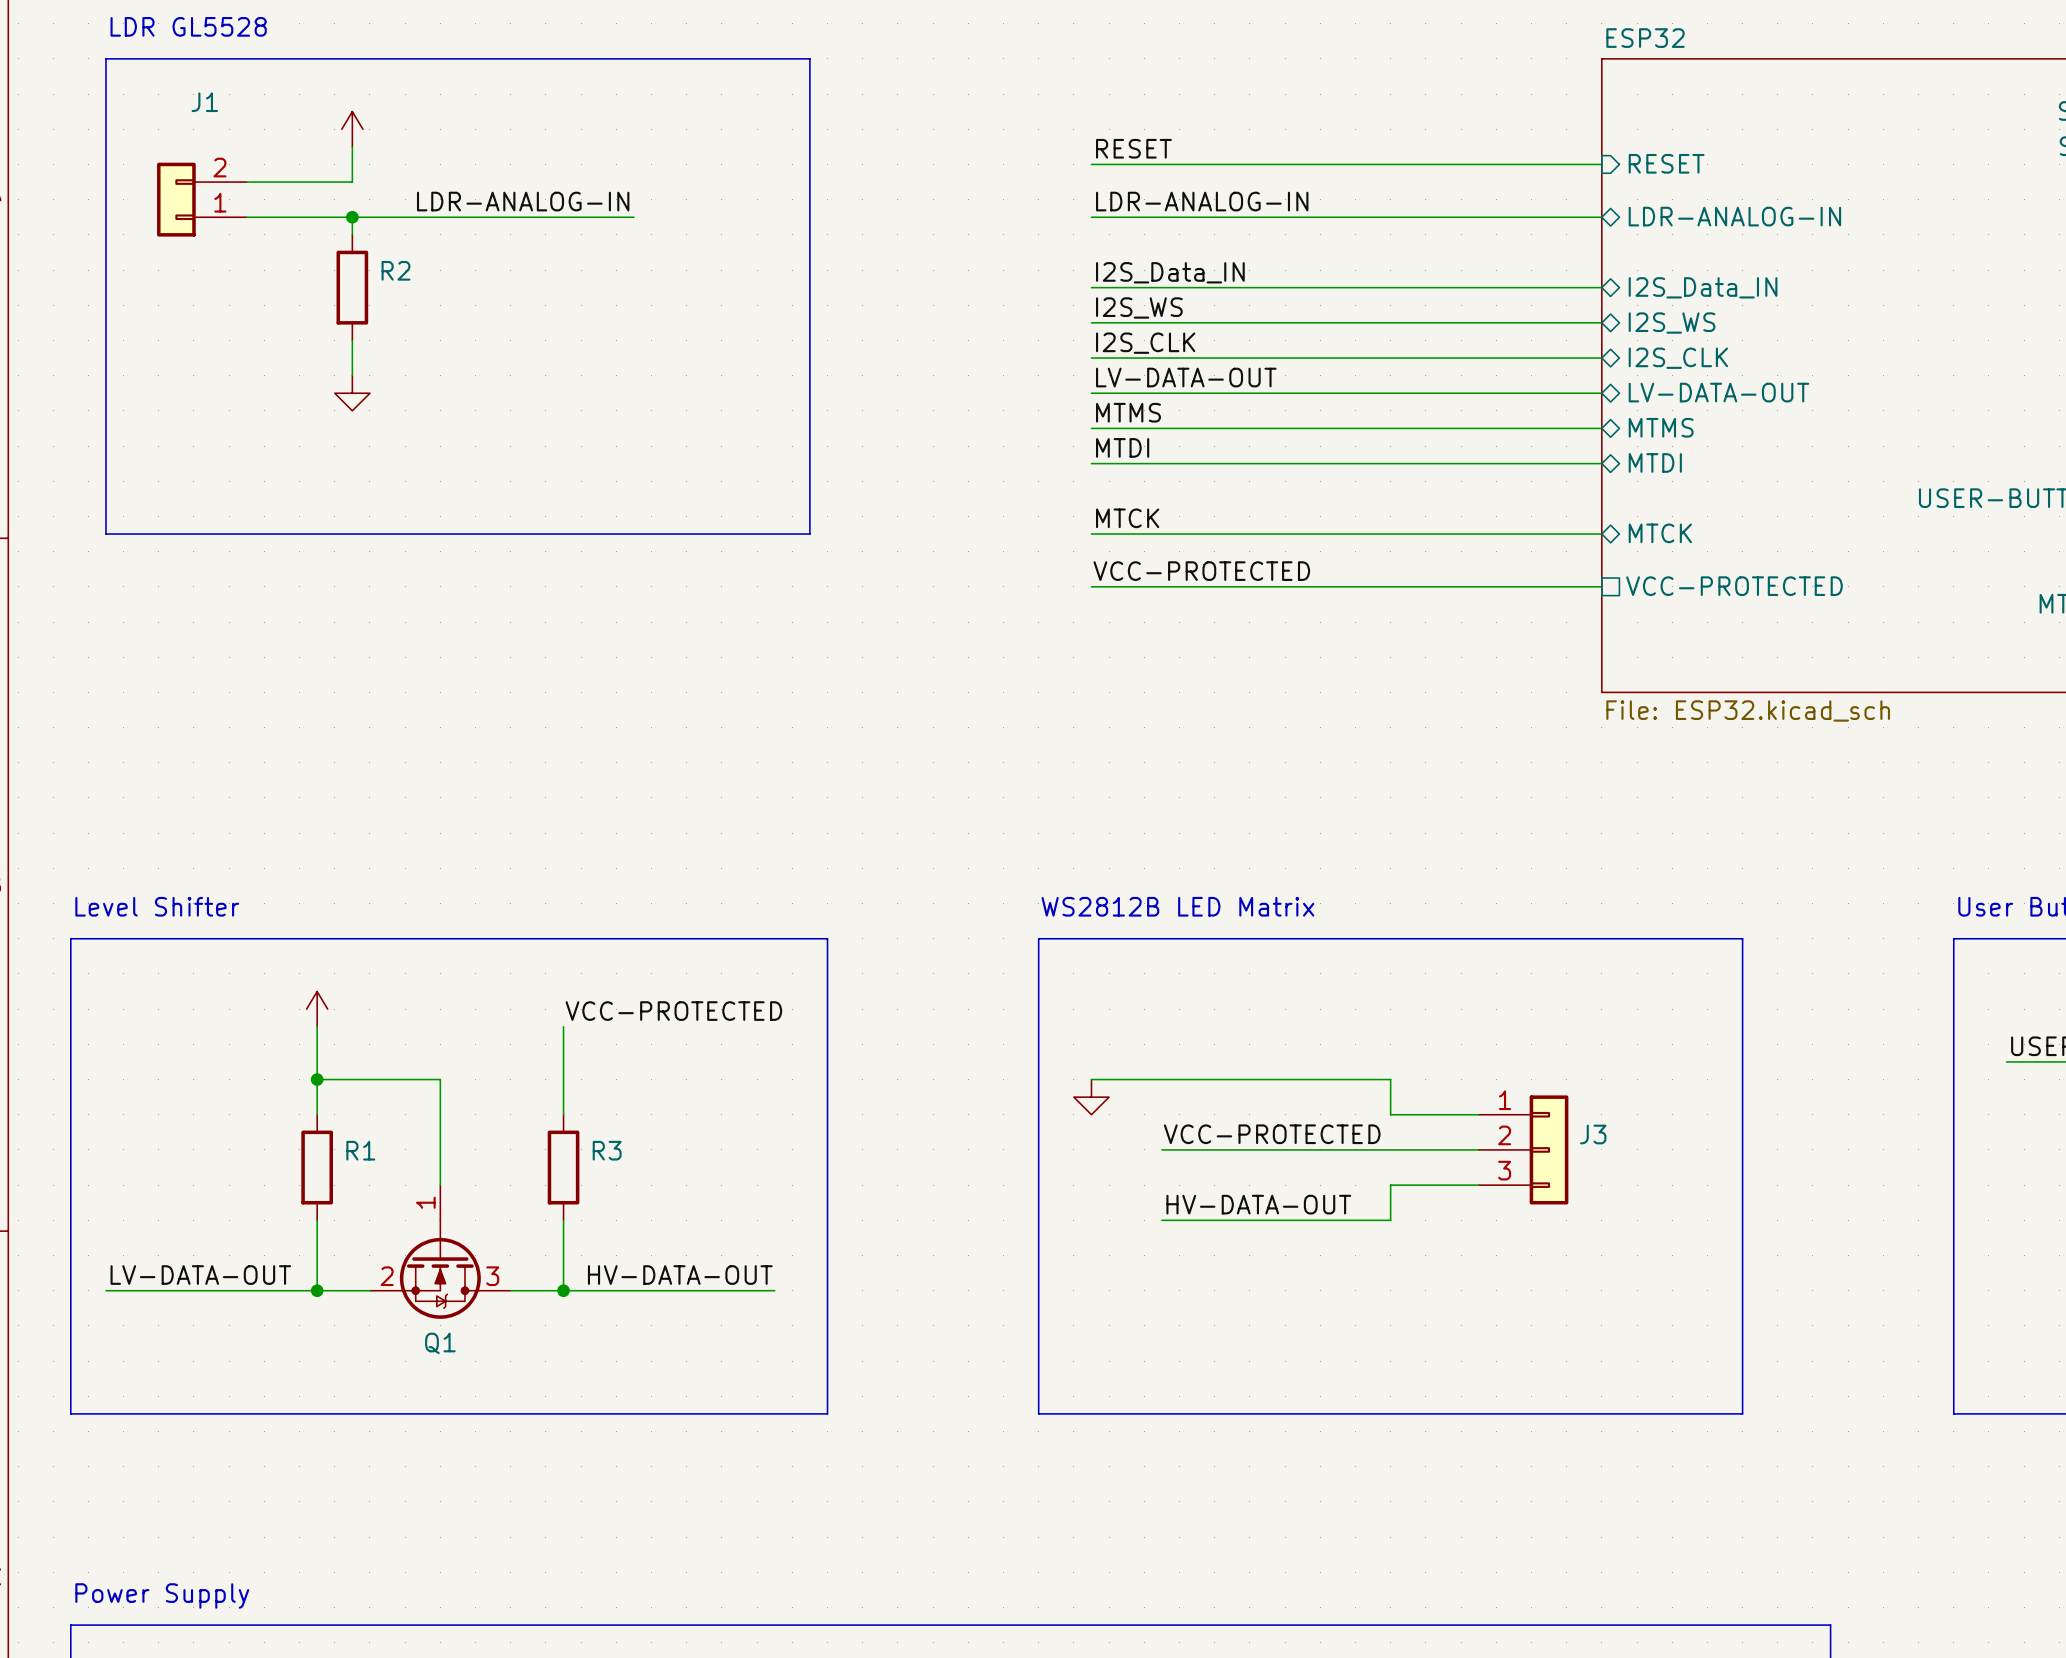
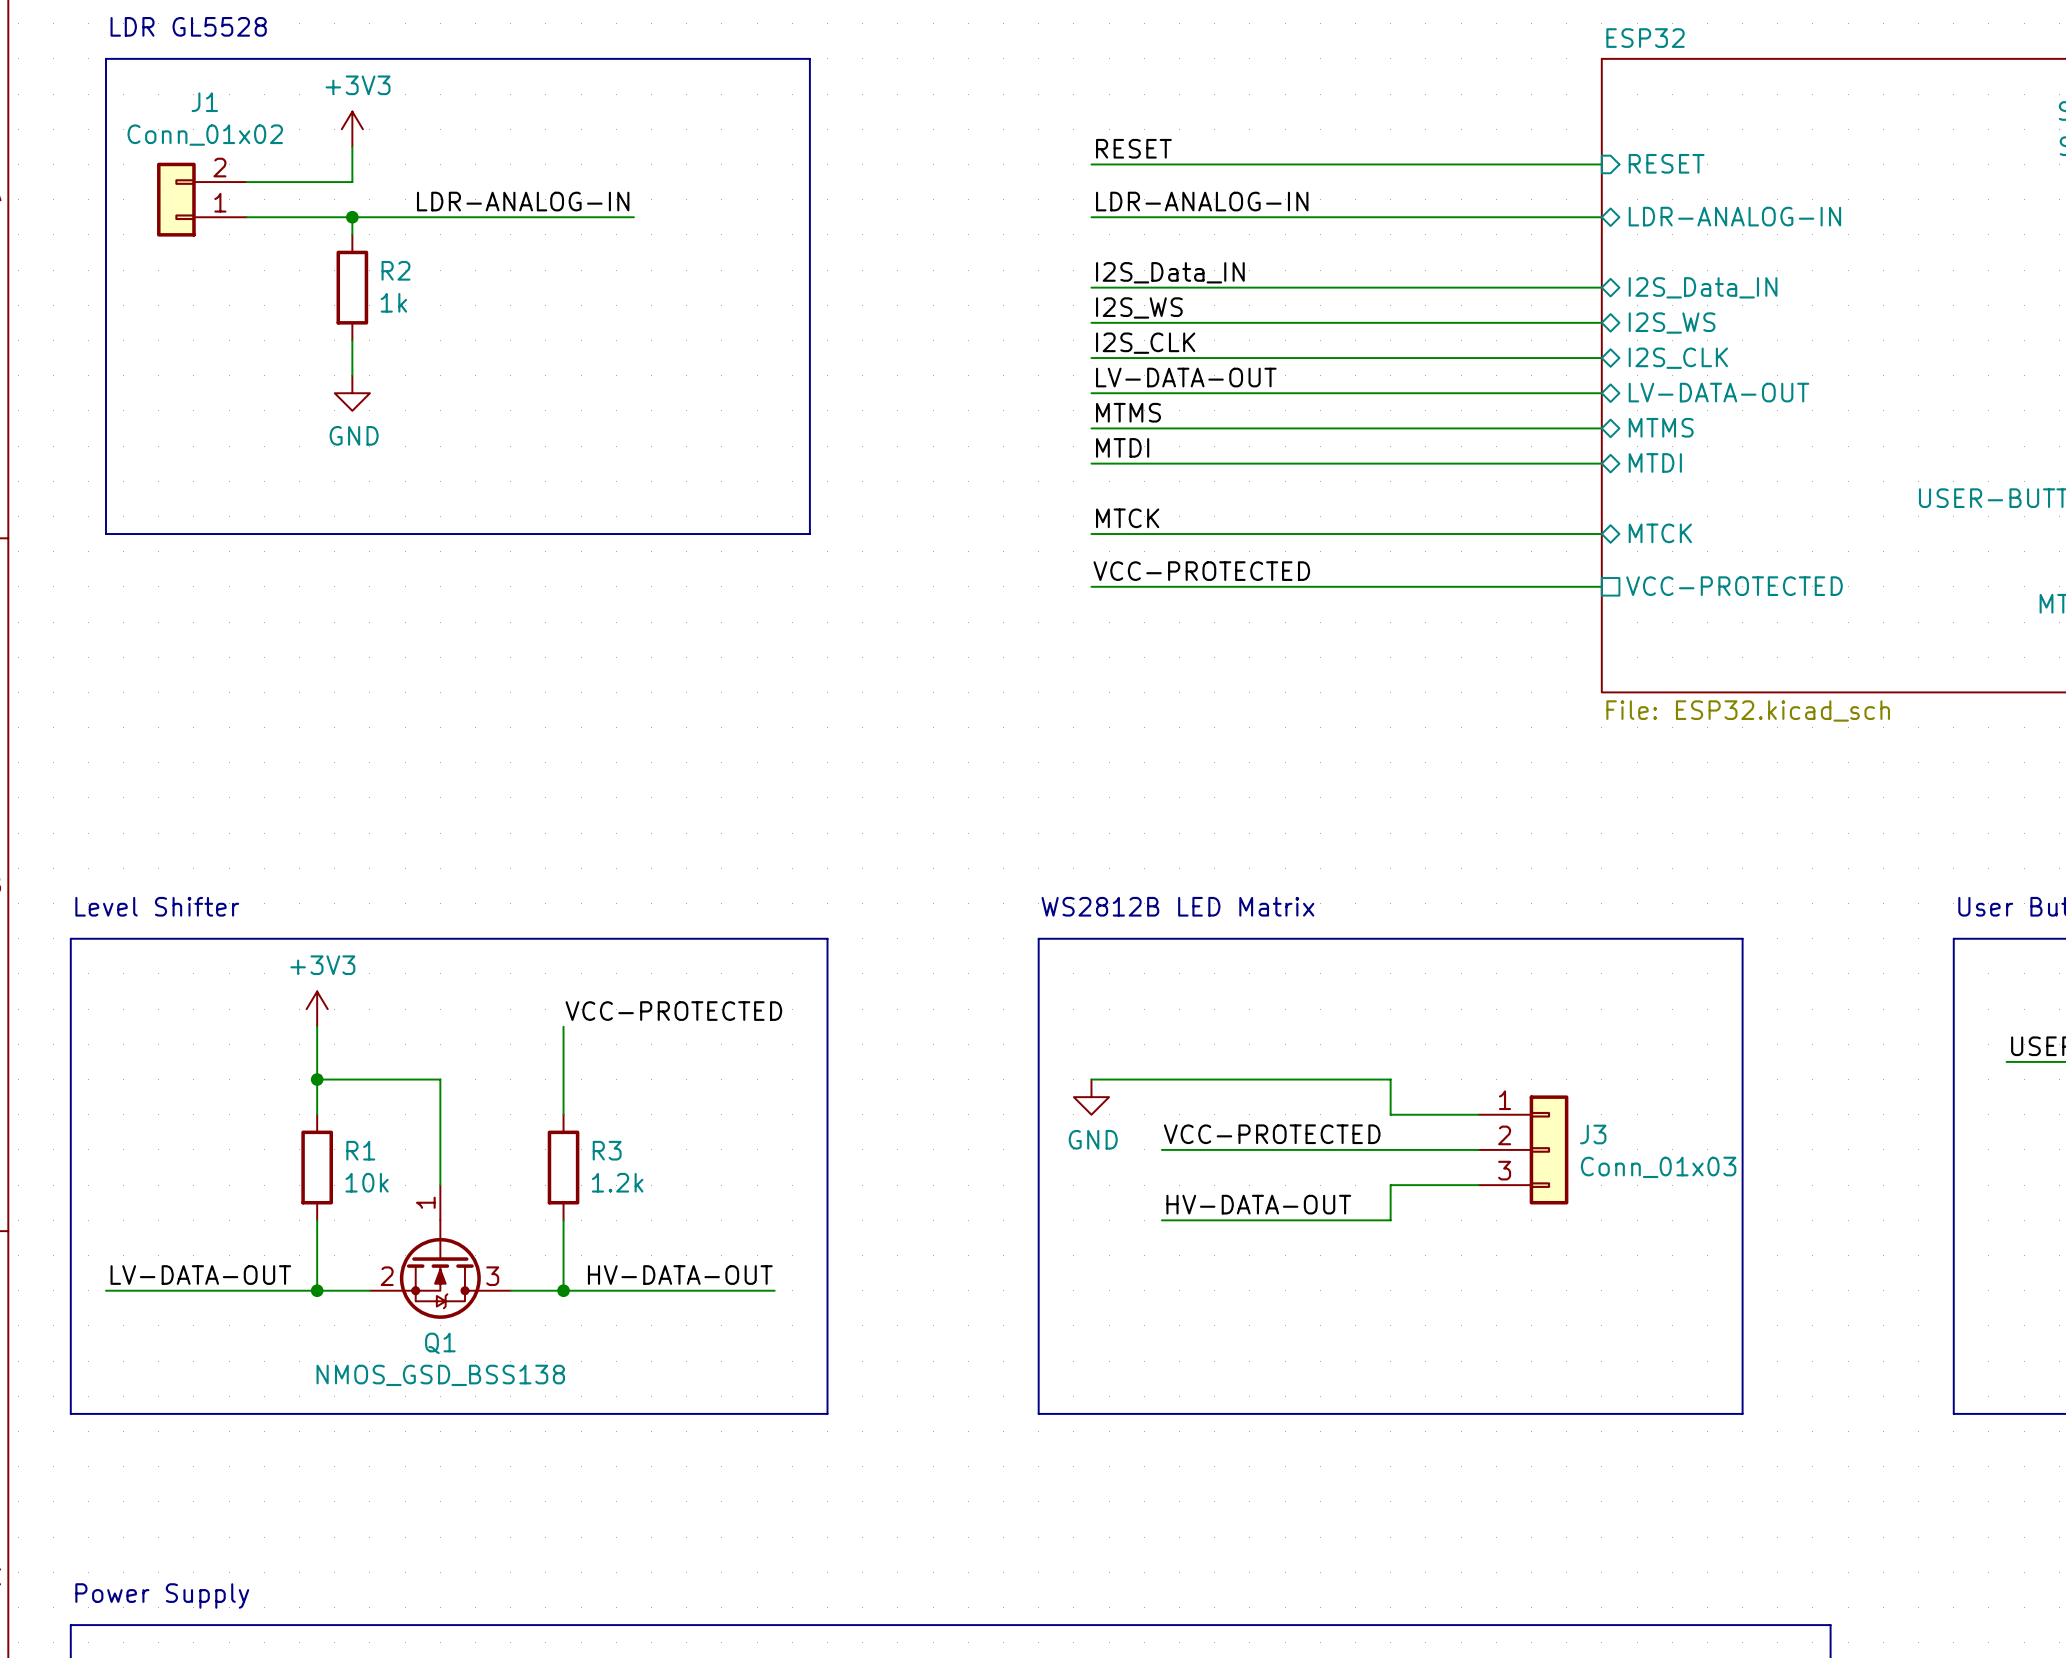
power symbol text: none -> +3V3 (358, 85)
J1 value: none -> Conn_01x02 (205, 135)
R2 value: none -> 1k (393, 302)
power symbol text: none -> GND (354, 435)
power symbol text: none -> +3V3 (322, 965)
power symbol text: none -> GND (1093, 1139)
J3 value: none -> Conn_01x03 (1658, 1167)
R1 value: none -> 10k (367, 1182)
R3 value: none -> 1.2k (617, 1182)
Q1 value: none -> NMOS_GSD_BSS138 (440, 1375)

